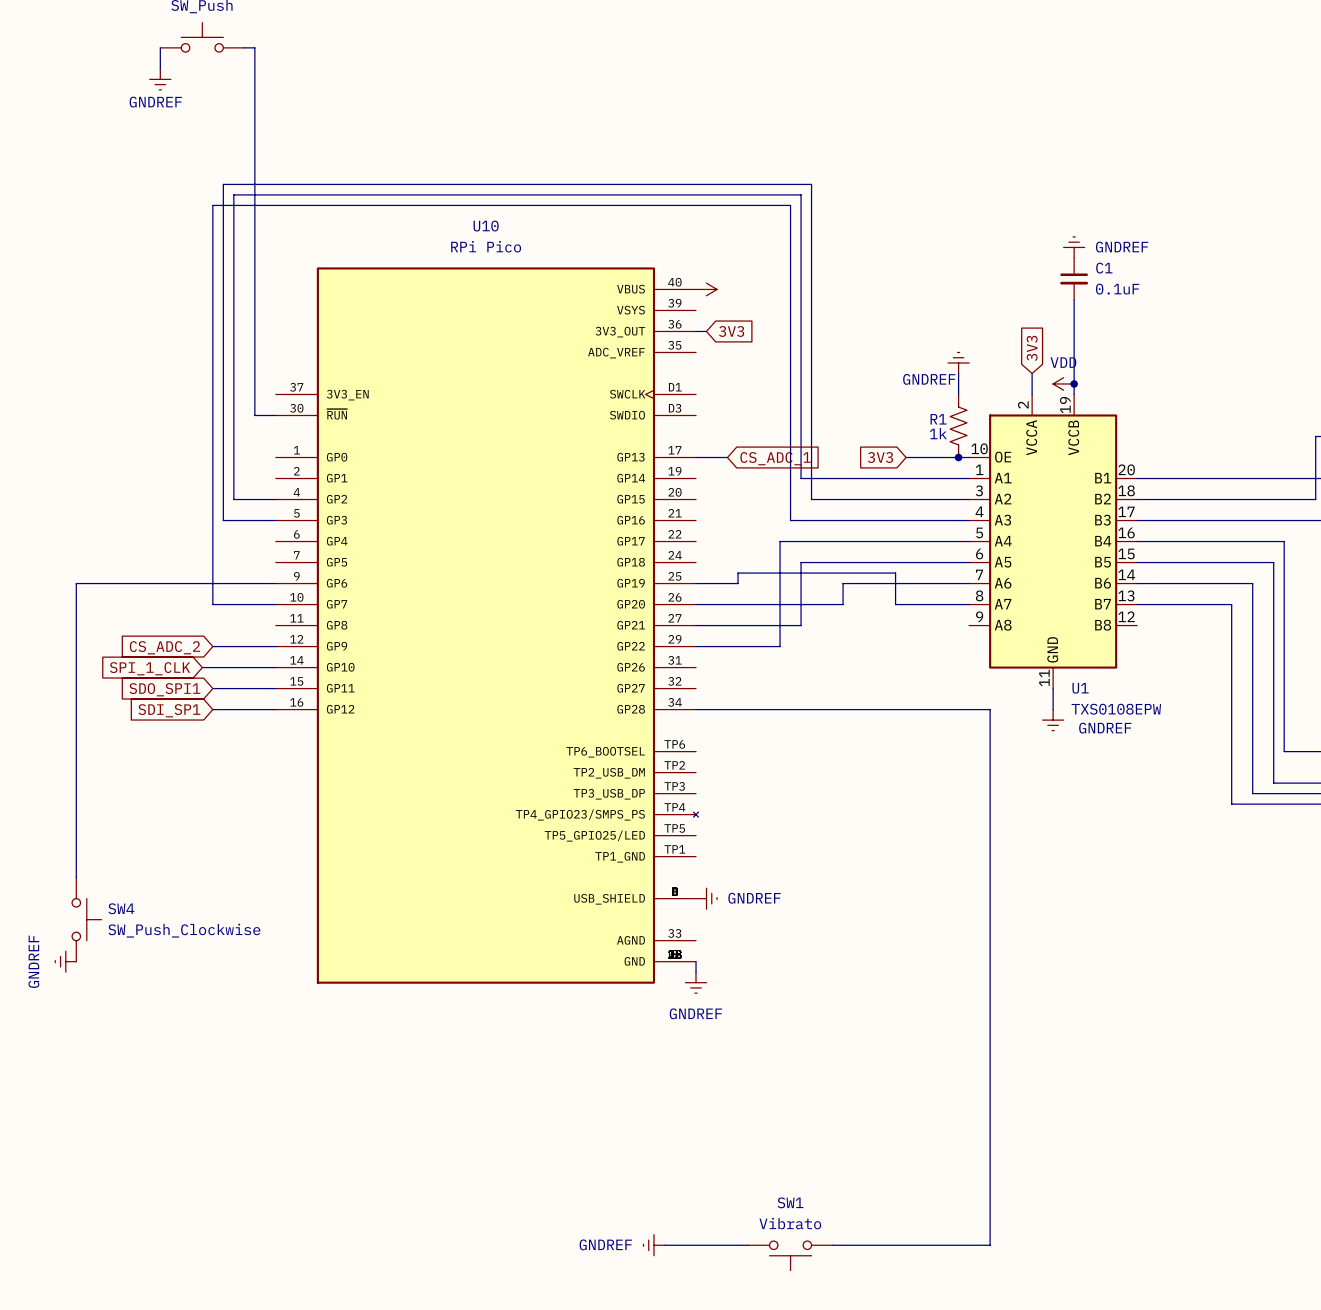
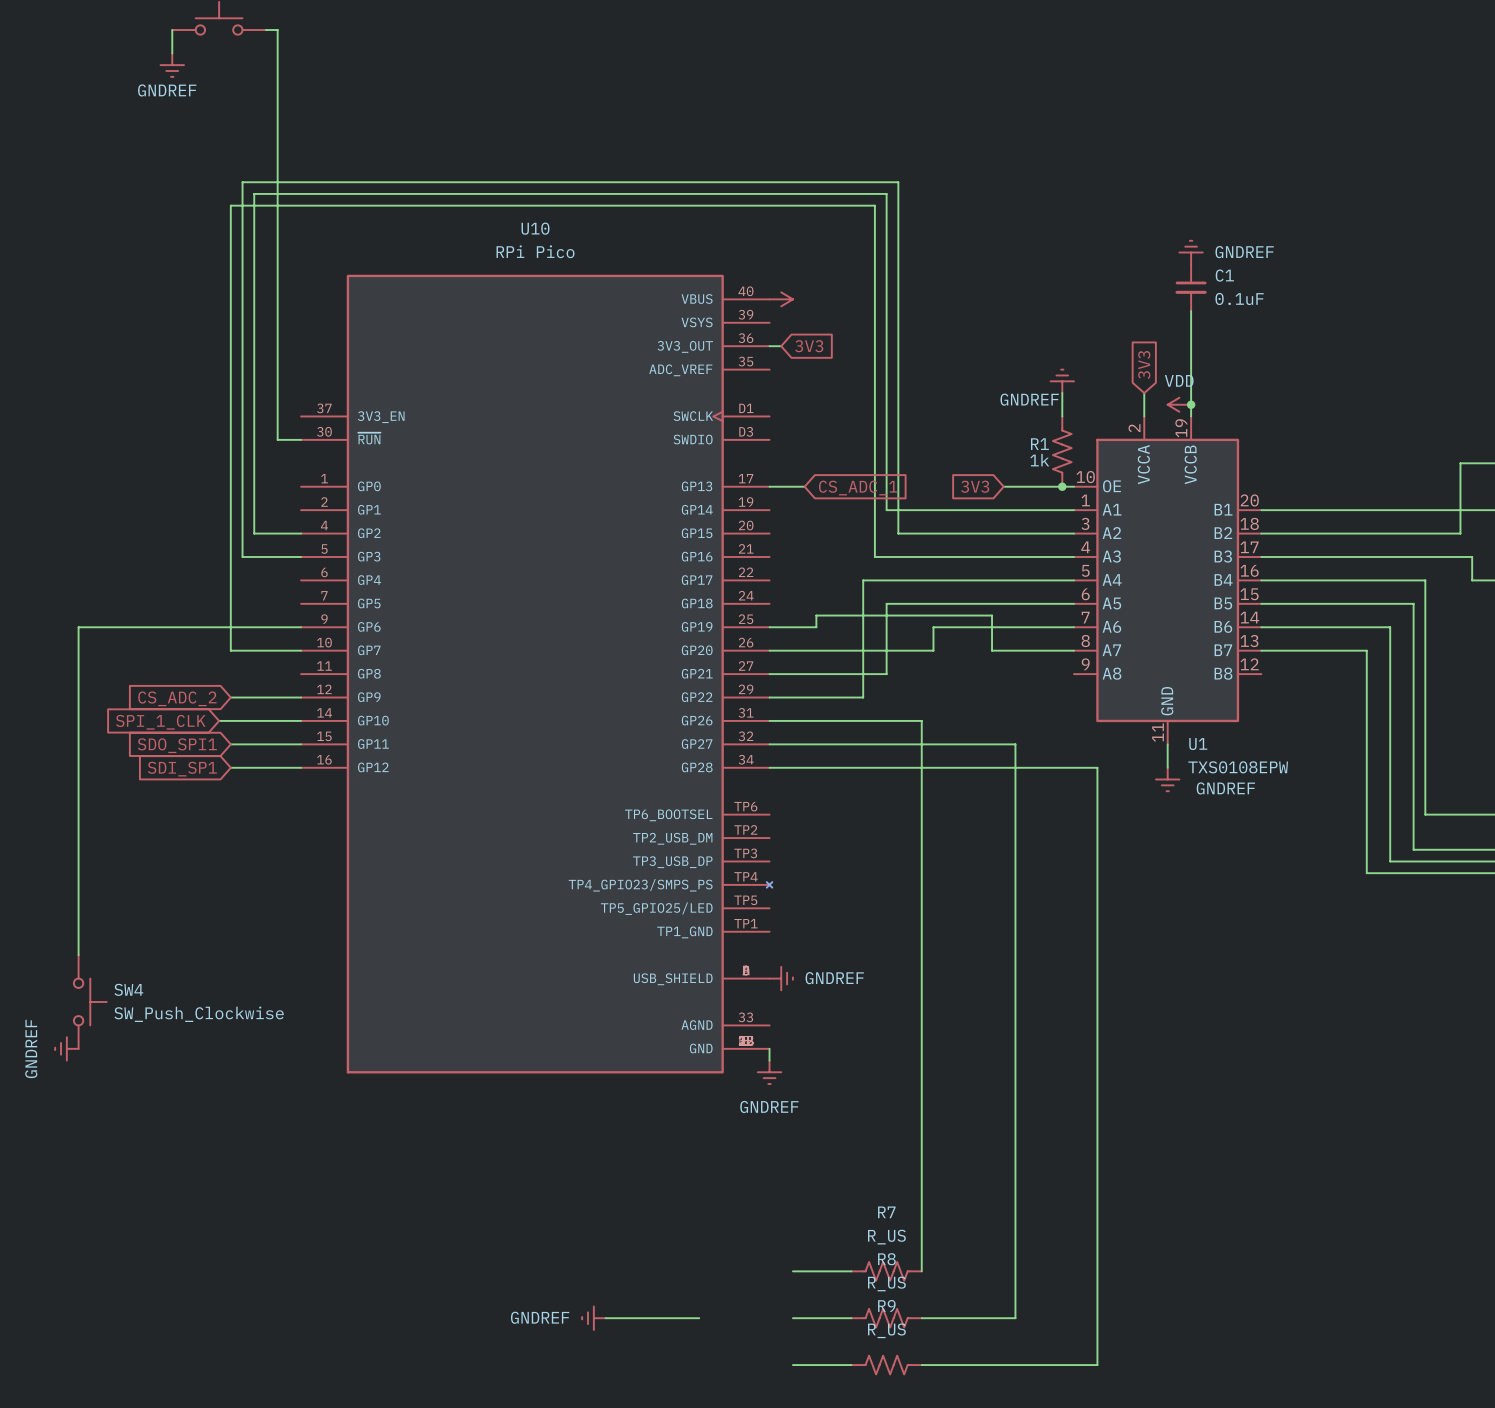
wire: none -> (769, 720) (921, 720) (921, 1271)
wire: none -> (769, 744) (1015, 744) (1015, 1318) (921, 1318)
wire: none -> (792, 1271) (851, 1271)
R7: none -> R_US (886, 1271)
wire: none -> (605, 1318) (699, 1318)
R8: none -> R_US (886, 1318)
power symbol position: GNDREF (653, 1245) -> GNDREF (593, 1318)
wire: (664, 1245) (717, 1245) -> (792, 1318) (851, 1318)
R9: none -> R_US (886, 1365)
SW1: Vibrato (790, 1255) -> none

